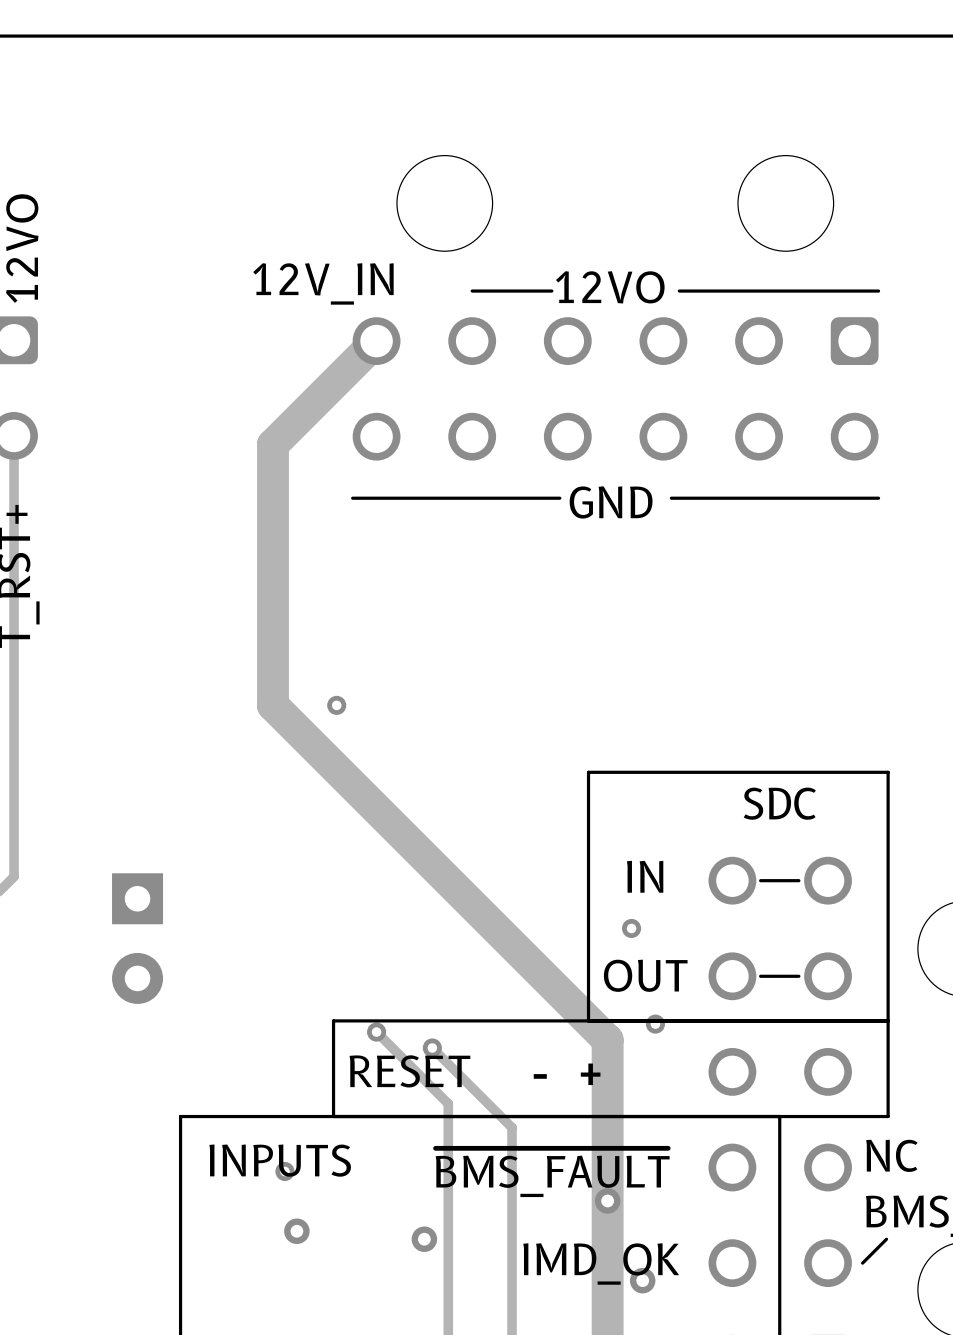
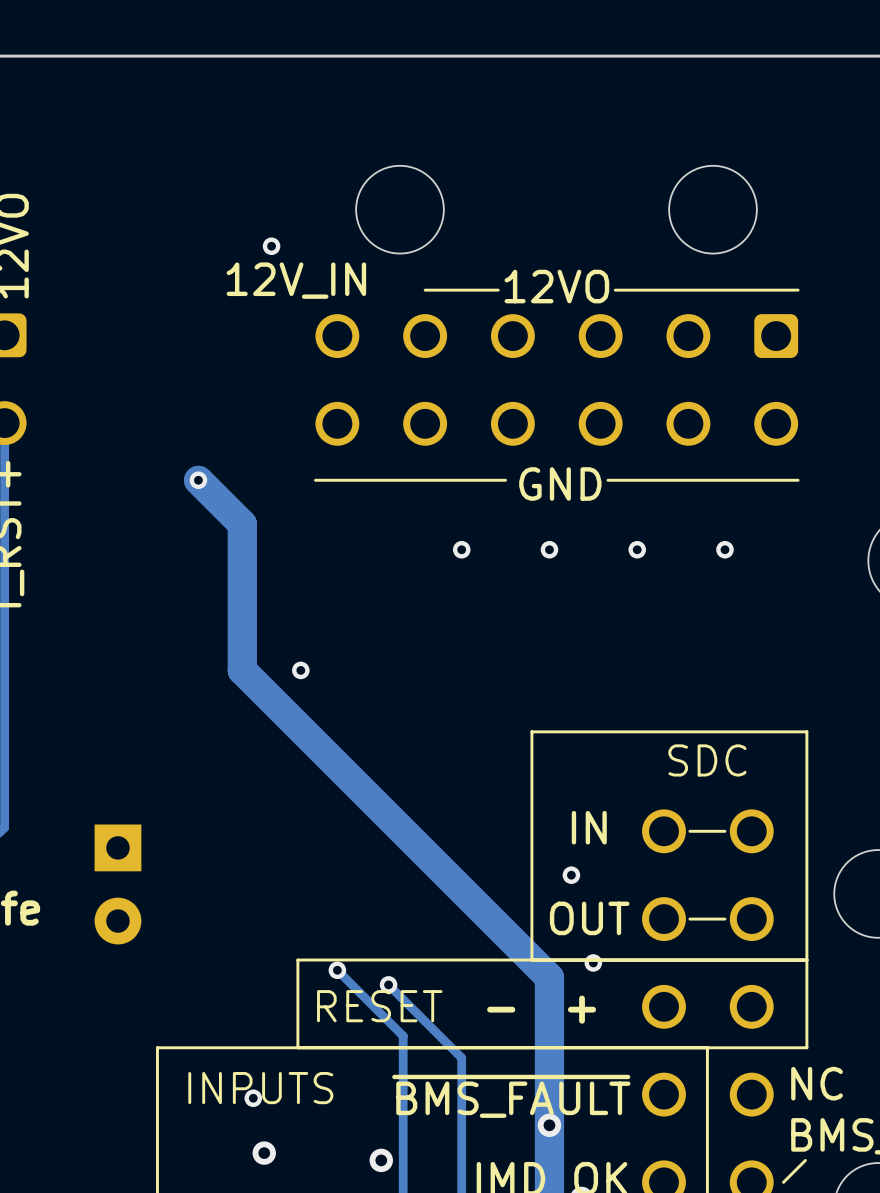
via: none -> (271, 246)
track: (376, 341) (272, 444) (272, 546) -> (198, 480) (242, 524)
via: none -> (198, 480)
via: none -> (461, 549)
via: none -> (549, 549)
via: none -> (637, 549)
via: none -> (724, 549)

